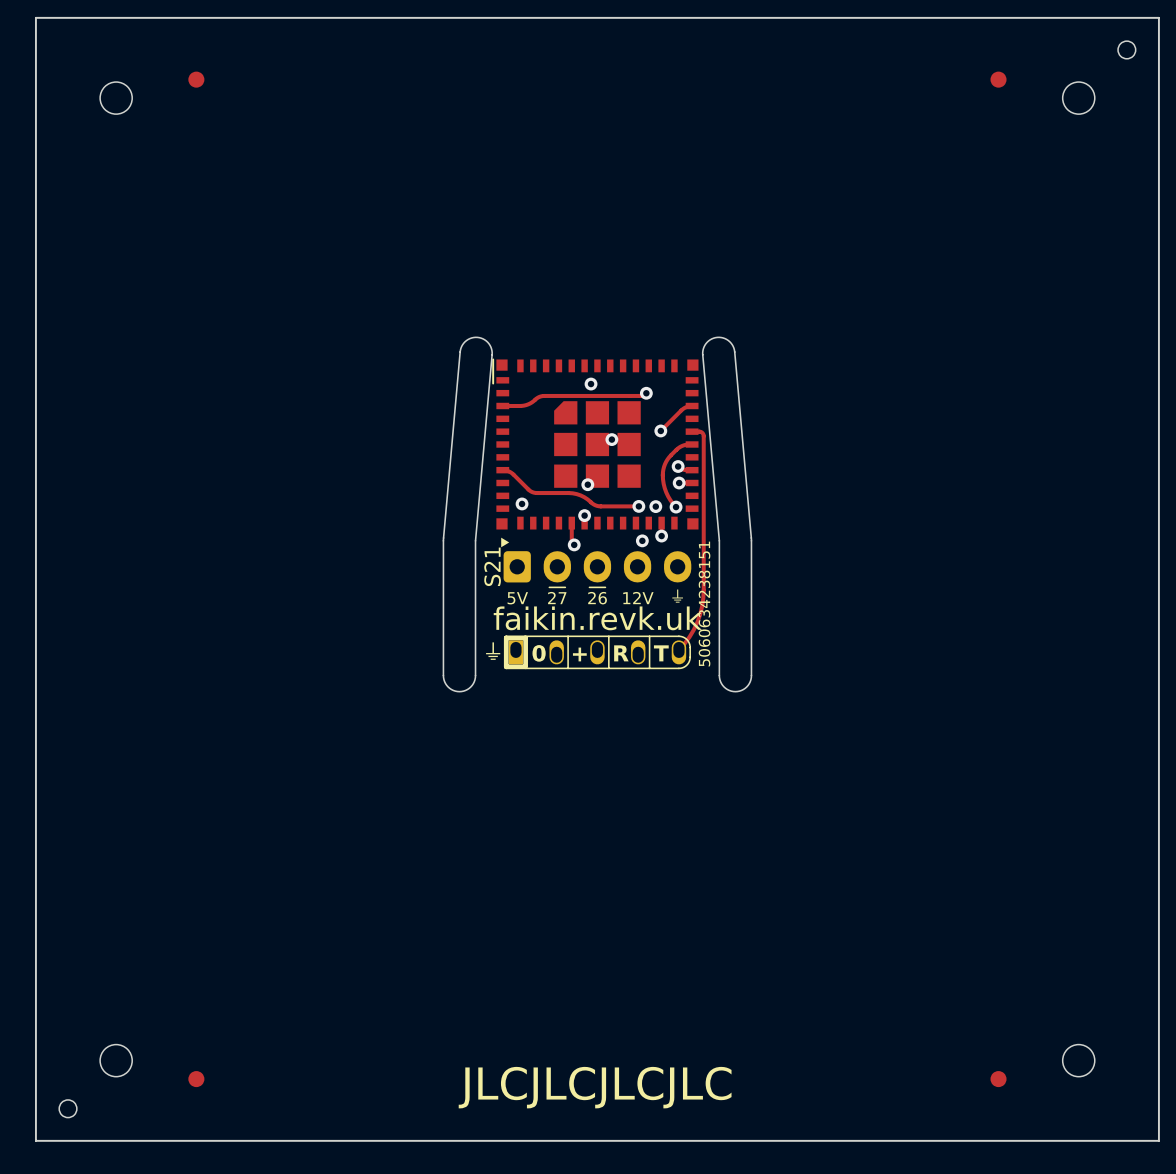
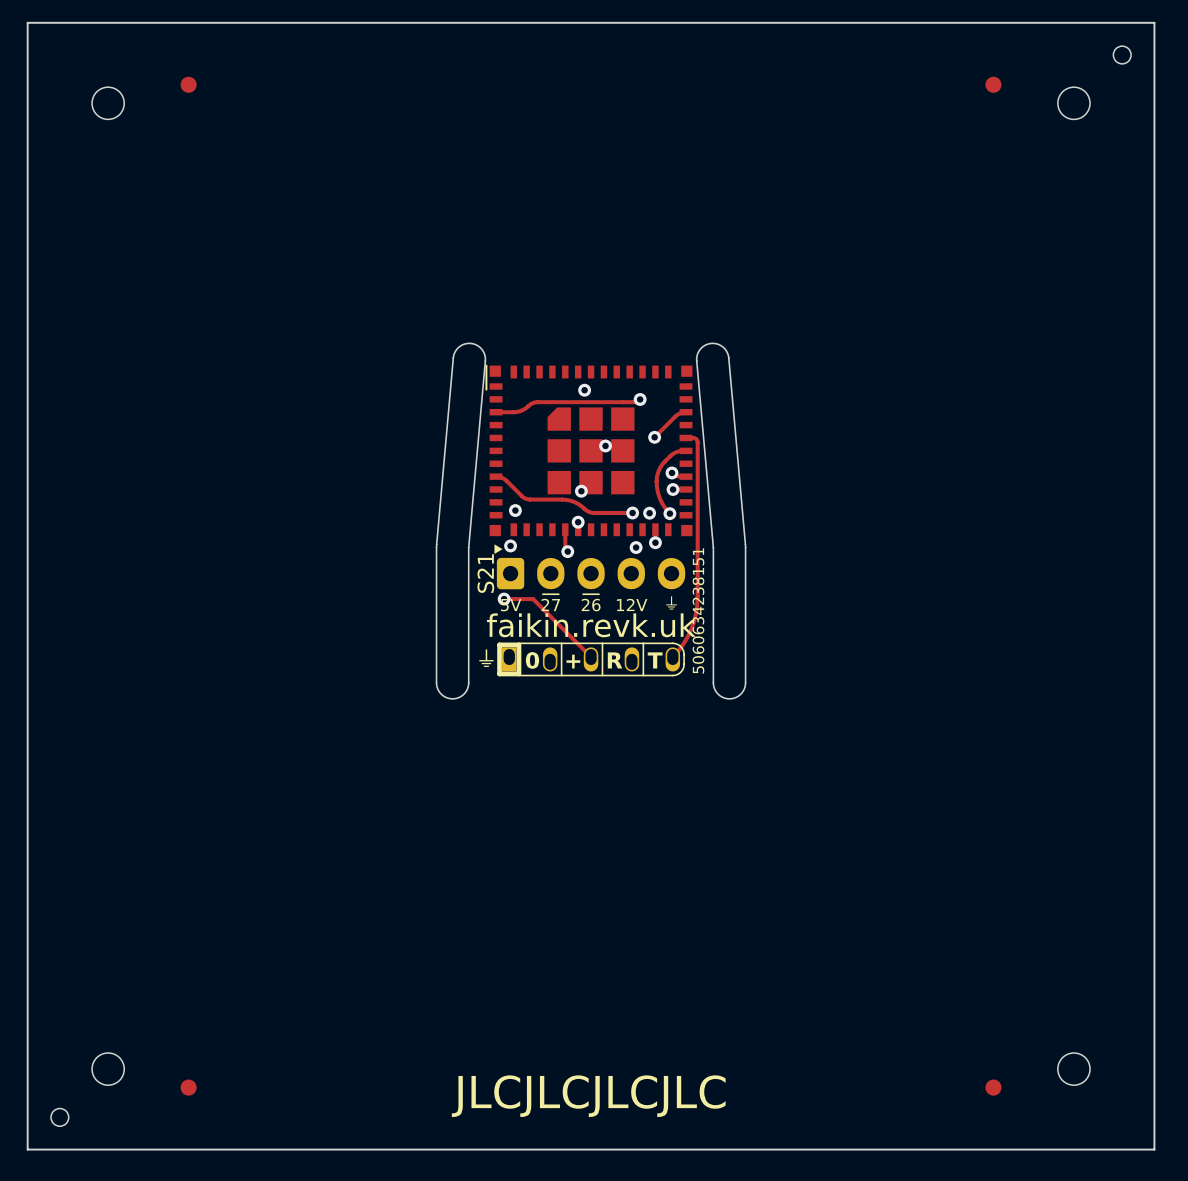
via: none -> (510, 545)
track: none -> (504, 599) (533, 599) (591, 657)
via: none -> (504, 599)

